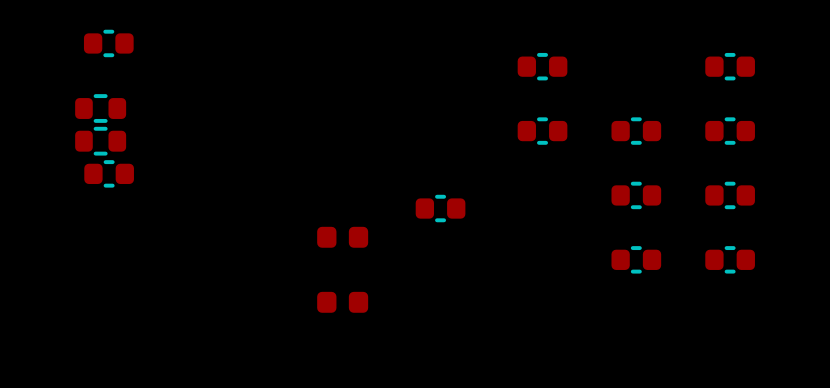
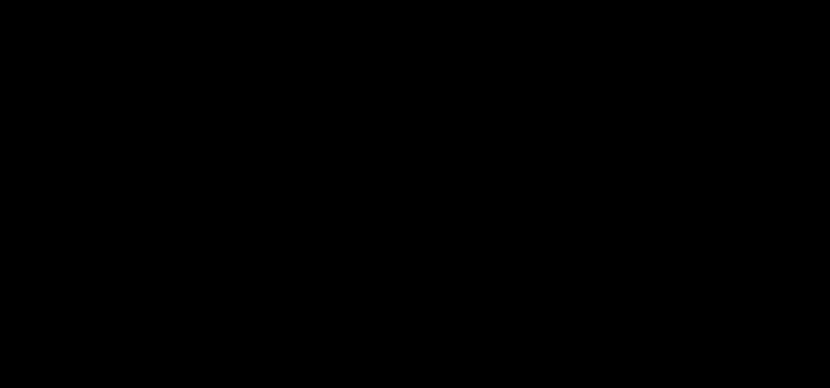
part: (108, 43) -> none
part: (542, 66) -> none
part: (730, 66) -> none
part: (100, 108) -> none
part: (542, 131) -> none
part: (636, 131) -> none
part: (730, 131) -> none
part: (100, 141) -> none
part: (109, 173) -> none
part: (636, 195) -> none
part: (730, 195) -> none
part: (440, 208) -> none
part: (342, 237) -> none
part: (636, 259) -> none
part: (730, 259) -> none
part: (342, 302) -> none

